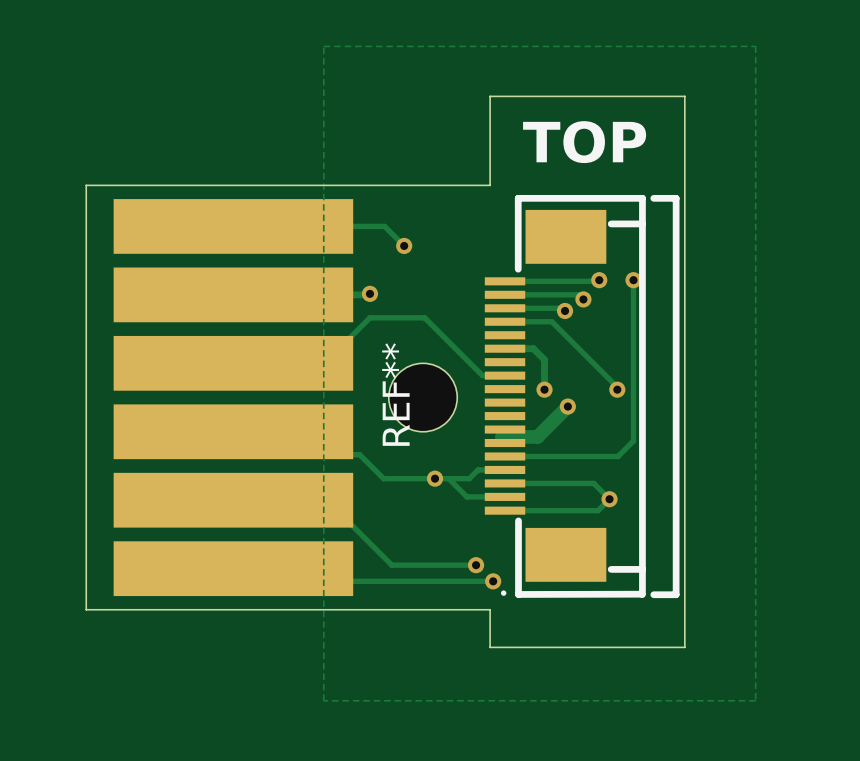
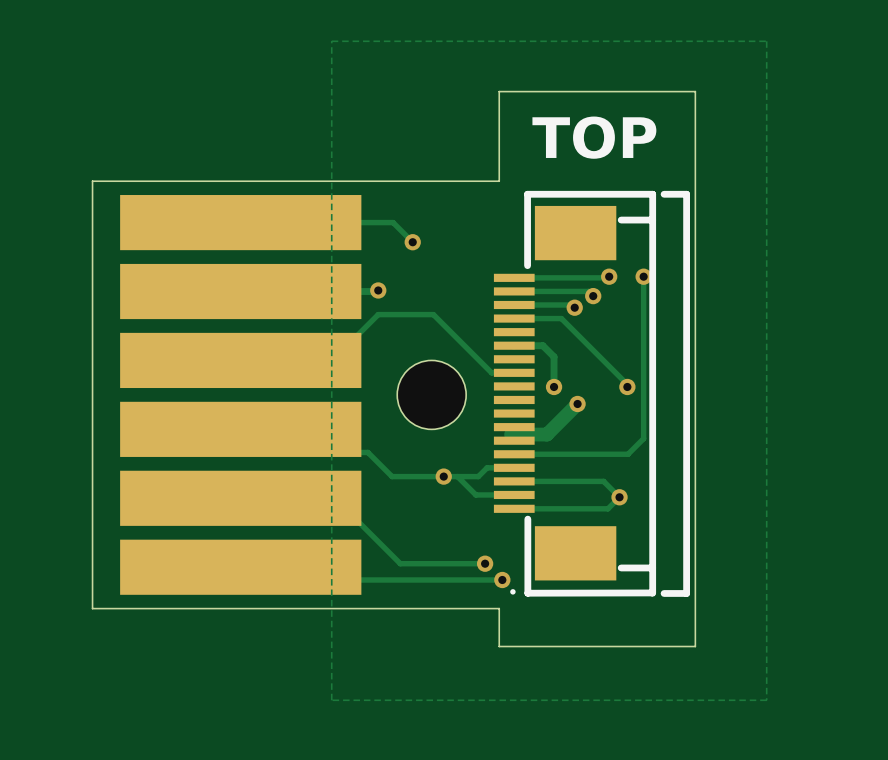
REF** name: REF** (395, 394) -> none

